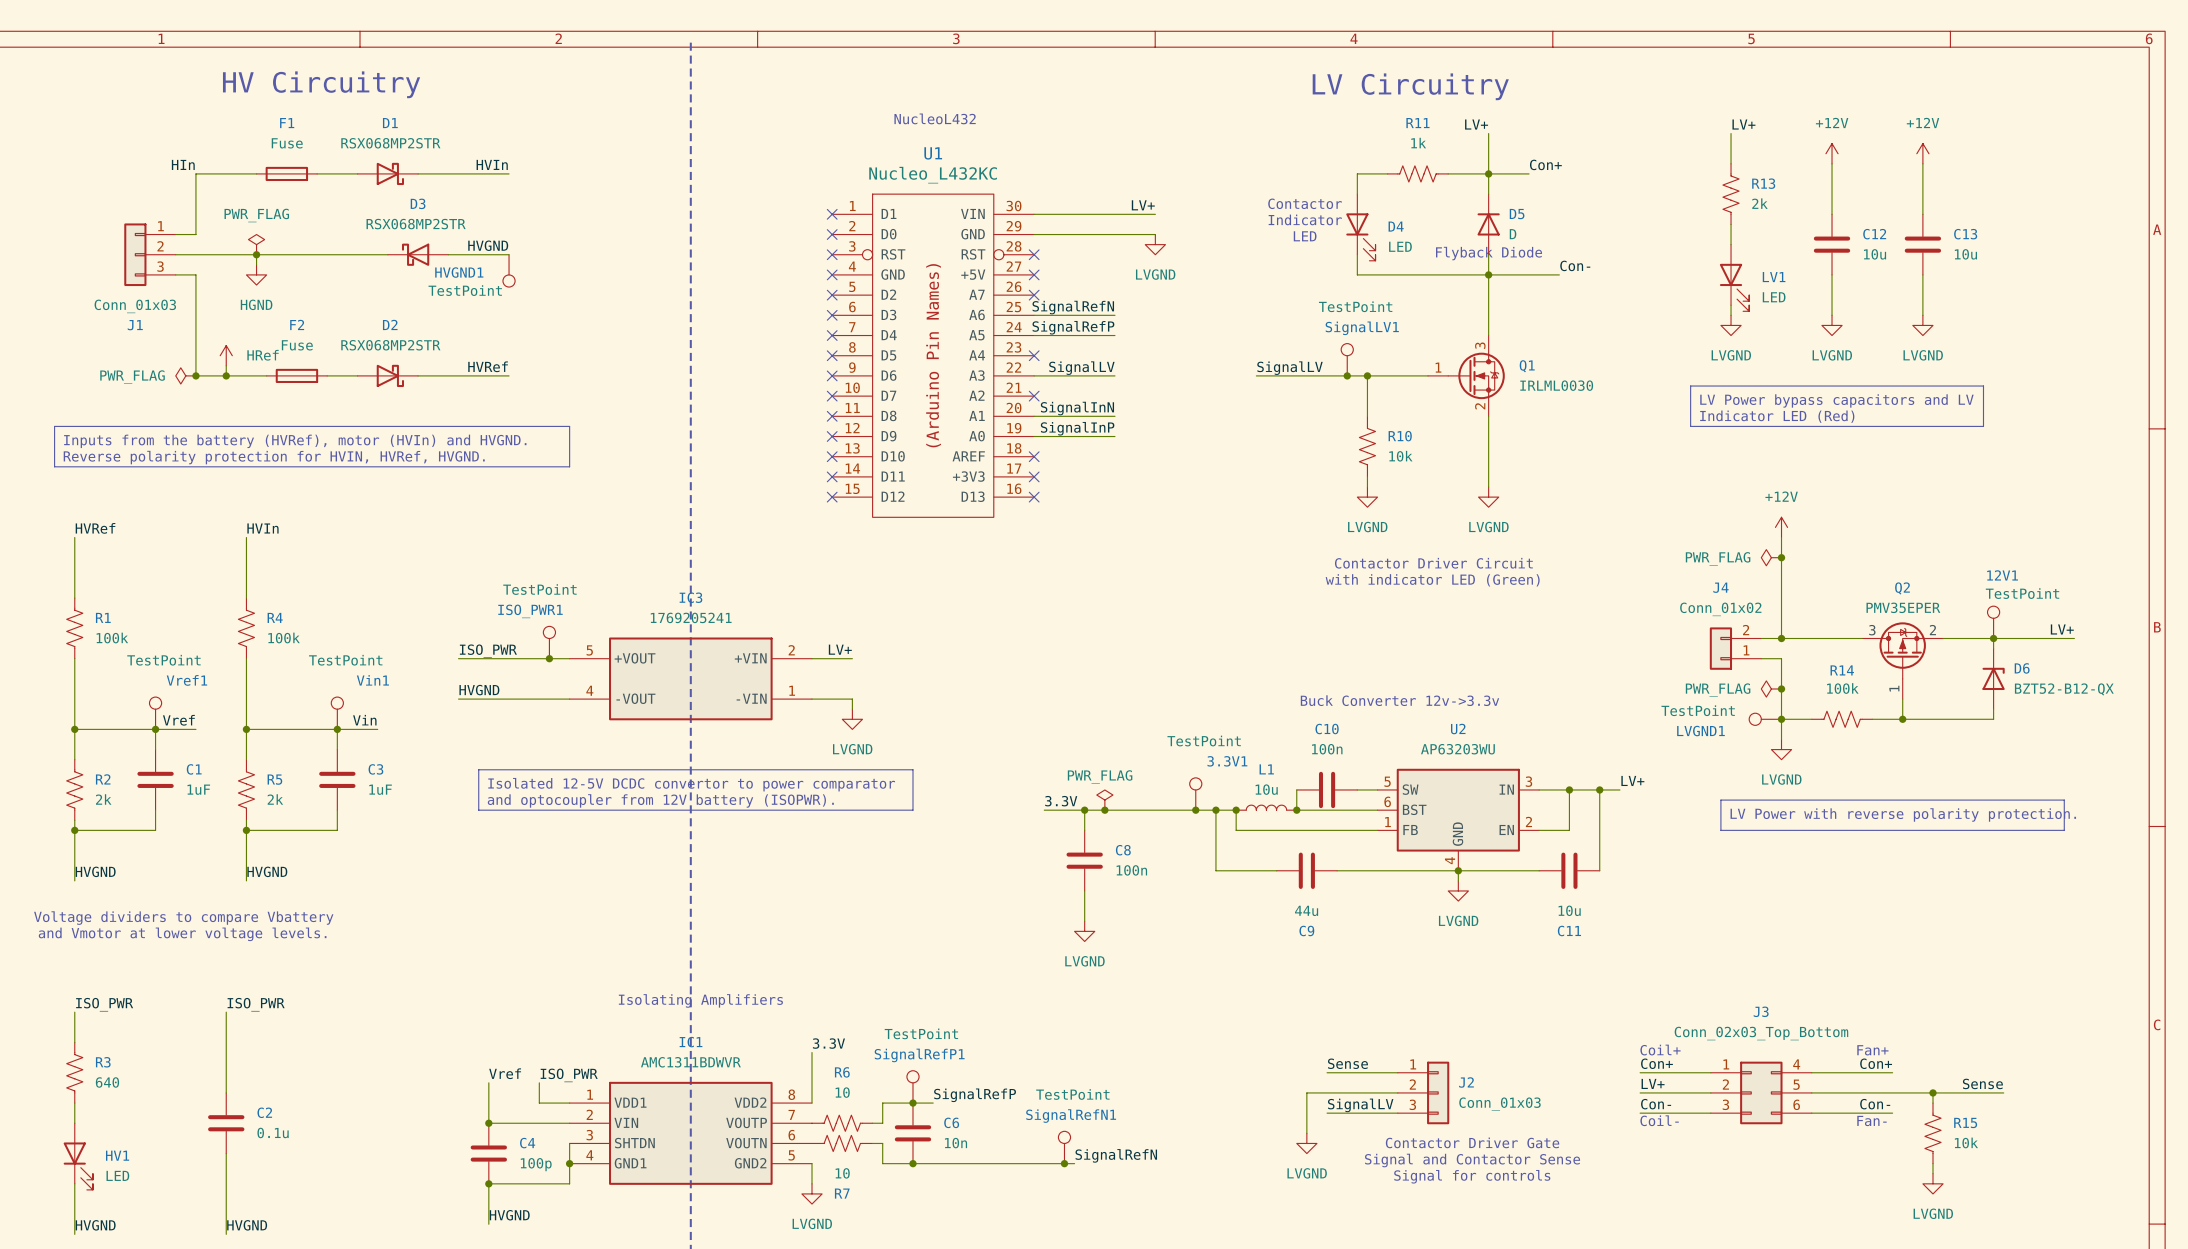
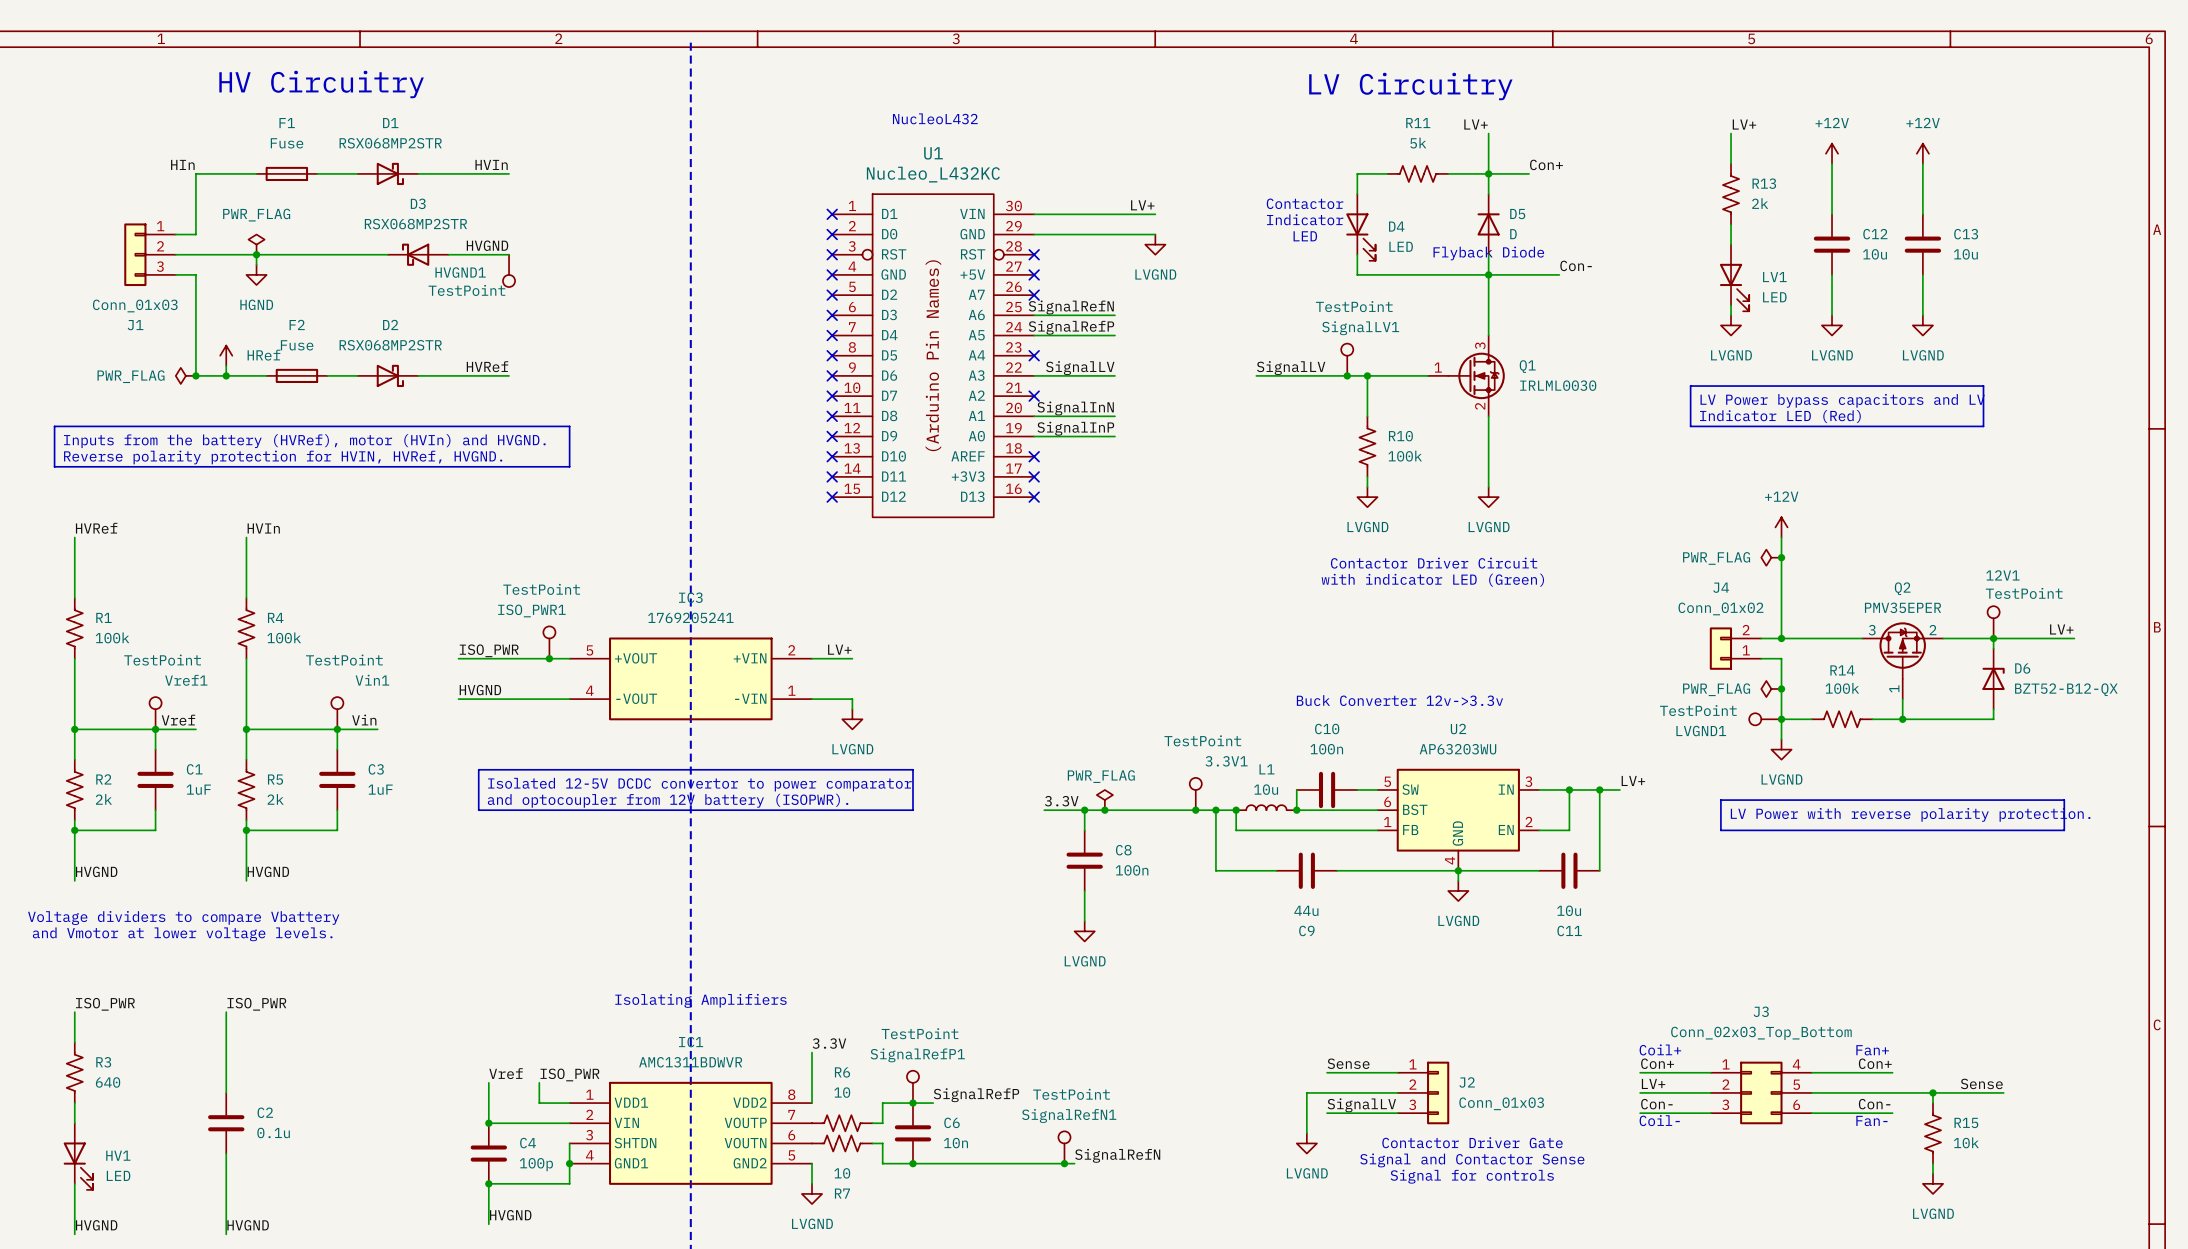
R11 value: 1k (1418, 143) -> 5k (1418, 143)
R10 value: 10k (1400, 456) -> 100k (1405, 456)

